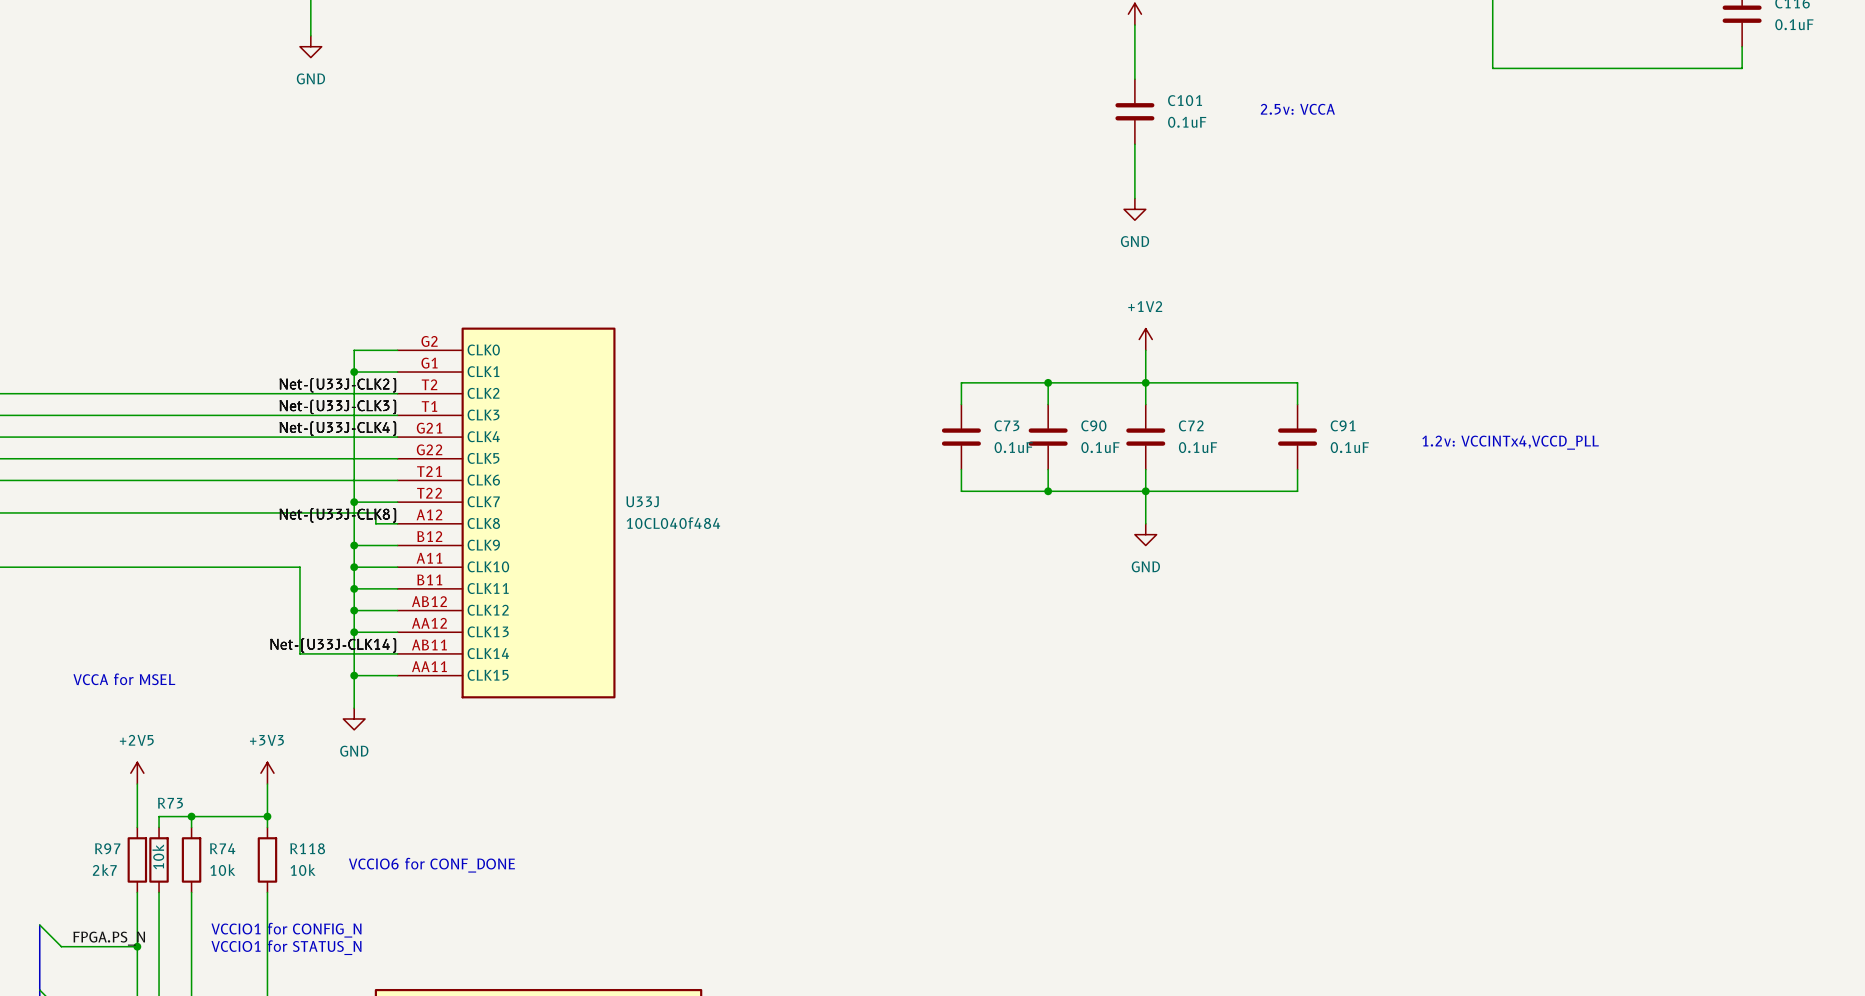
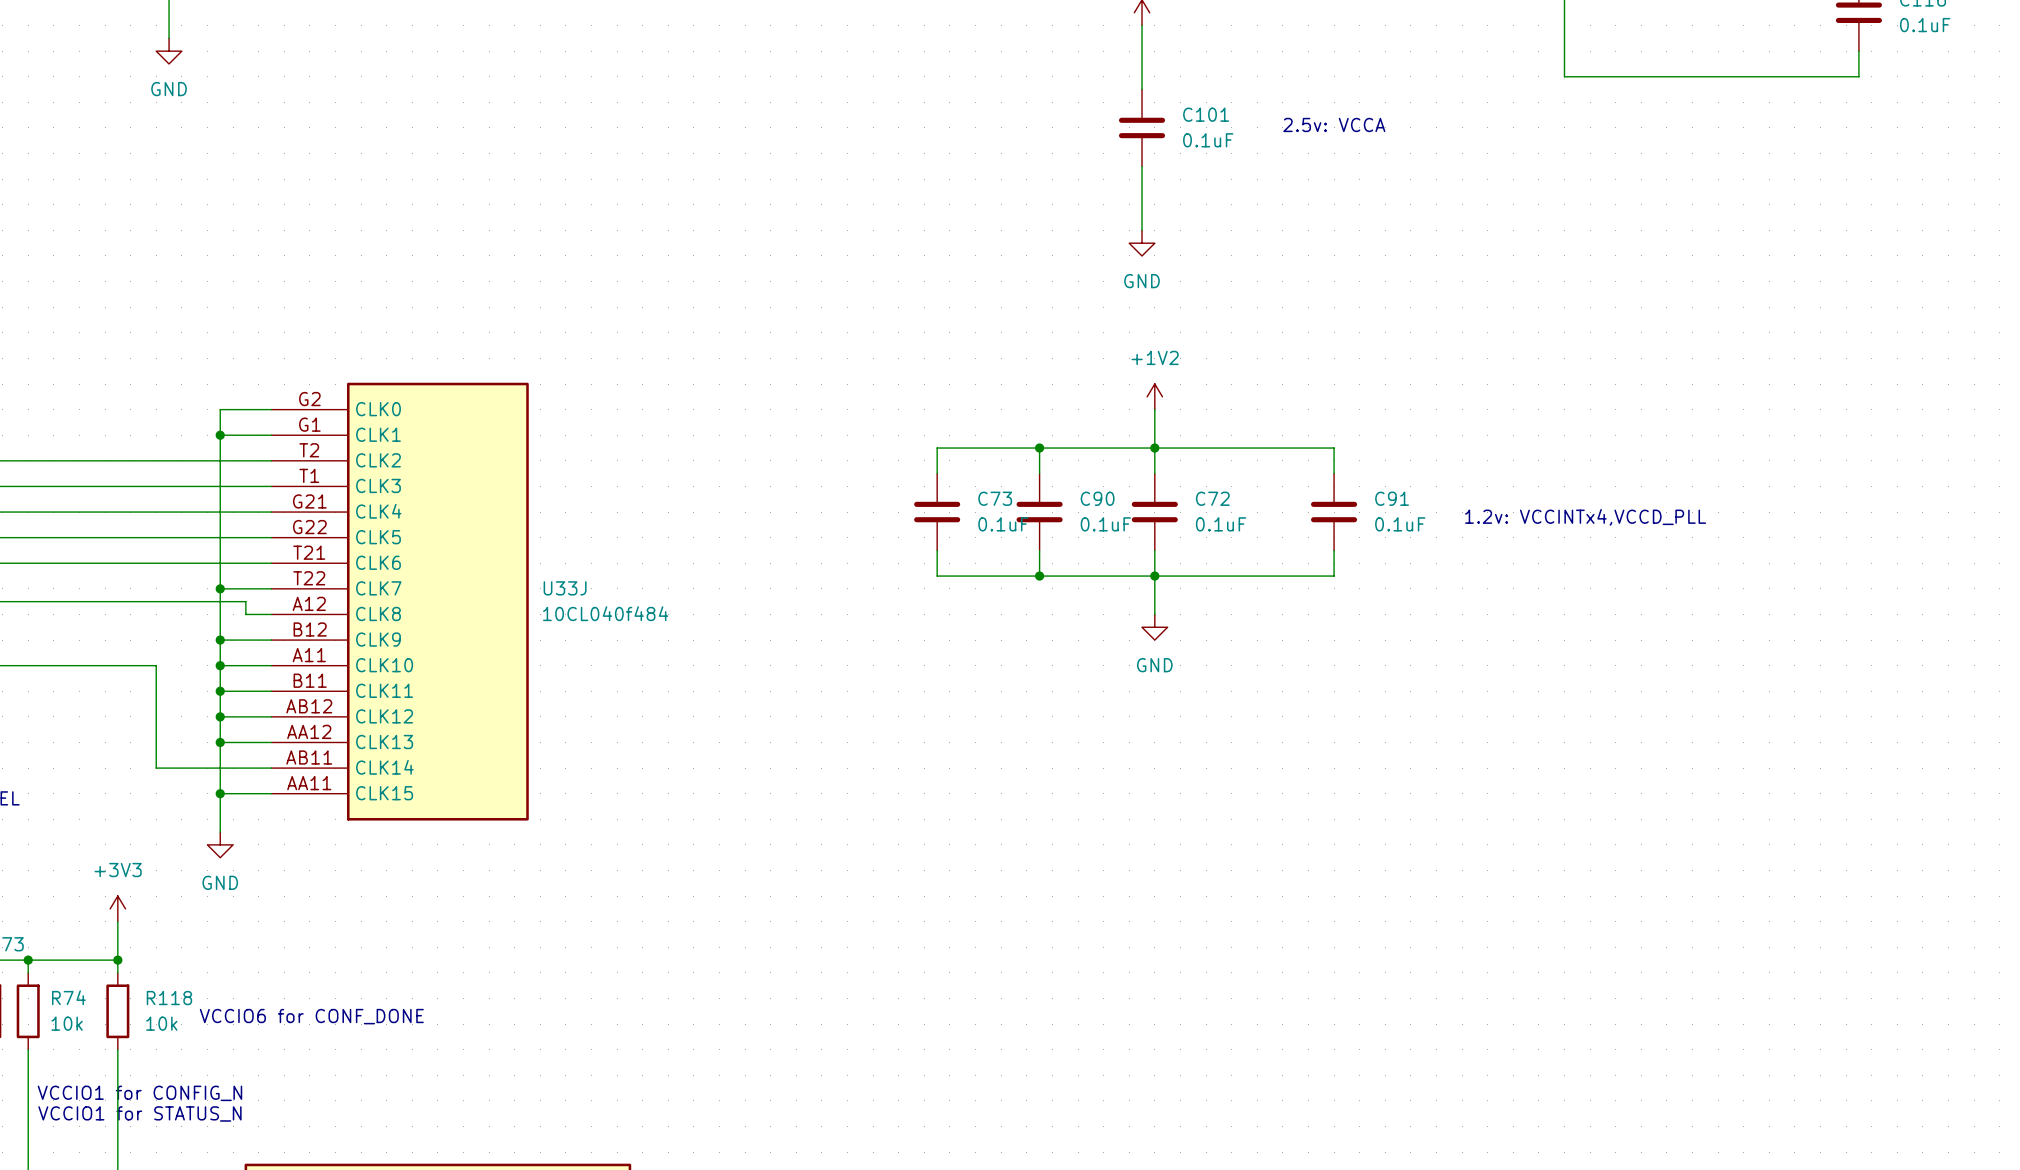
label: Net-(U33J-CLK2) (337, 385) -> none
label: Net-(U33J-CLK3) (337, 406) -> none
label: Net-(U33J-CLK4) (337, 428) -> none
label: Net-(U33J-CLK8) (337, 515) -> none
label: Net-(U33J-CLK14) (333, 645) -> none

